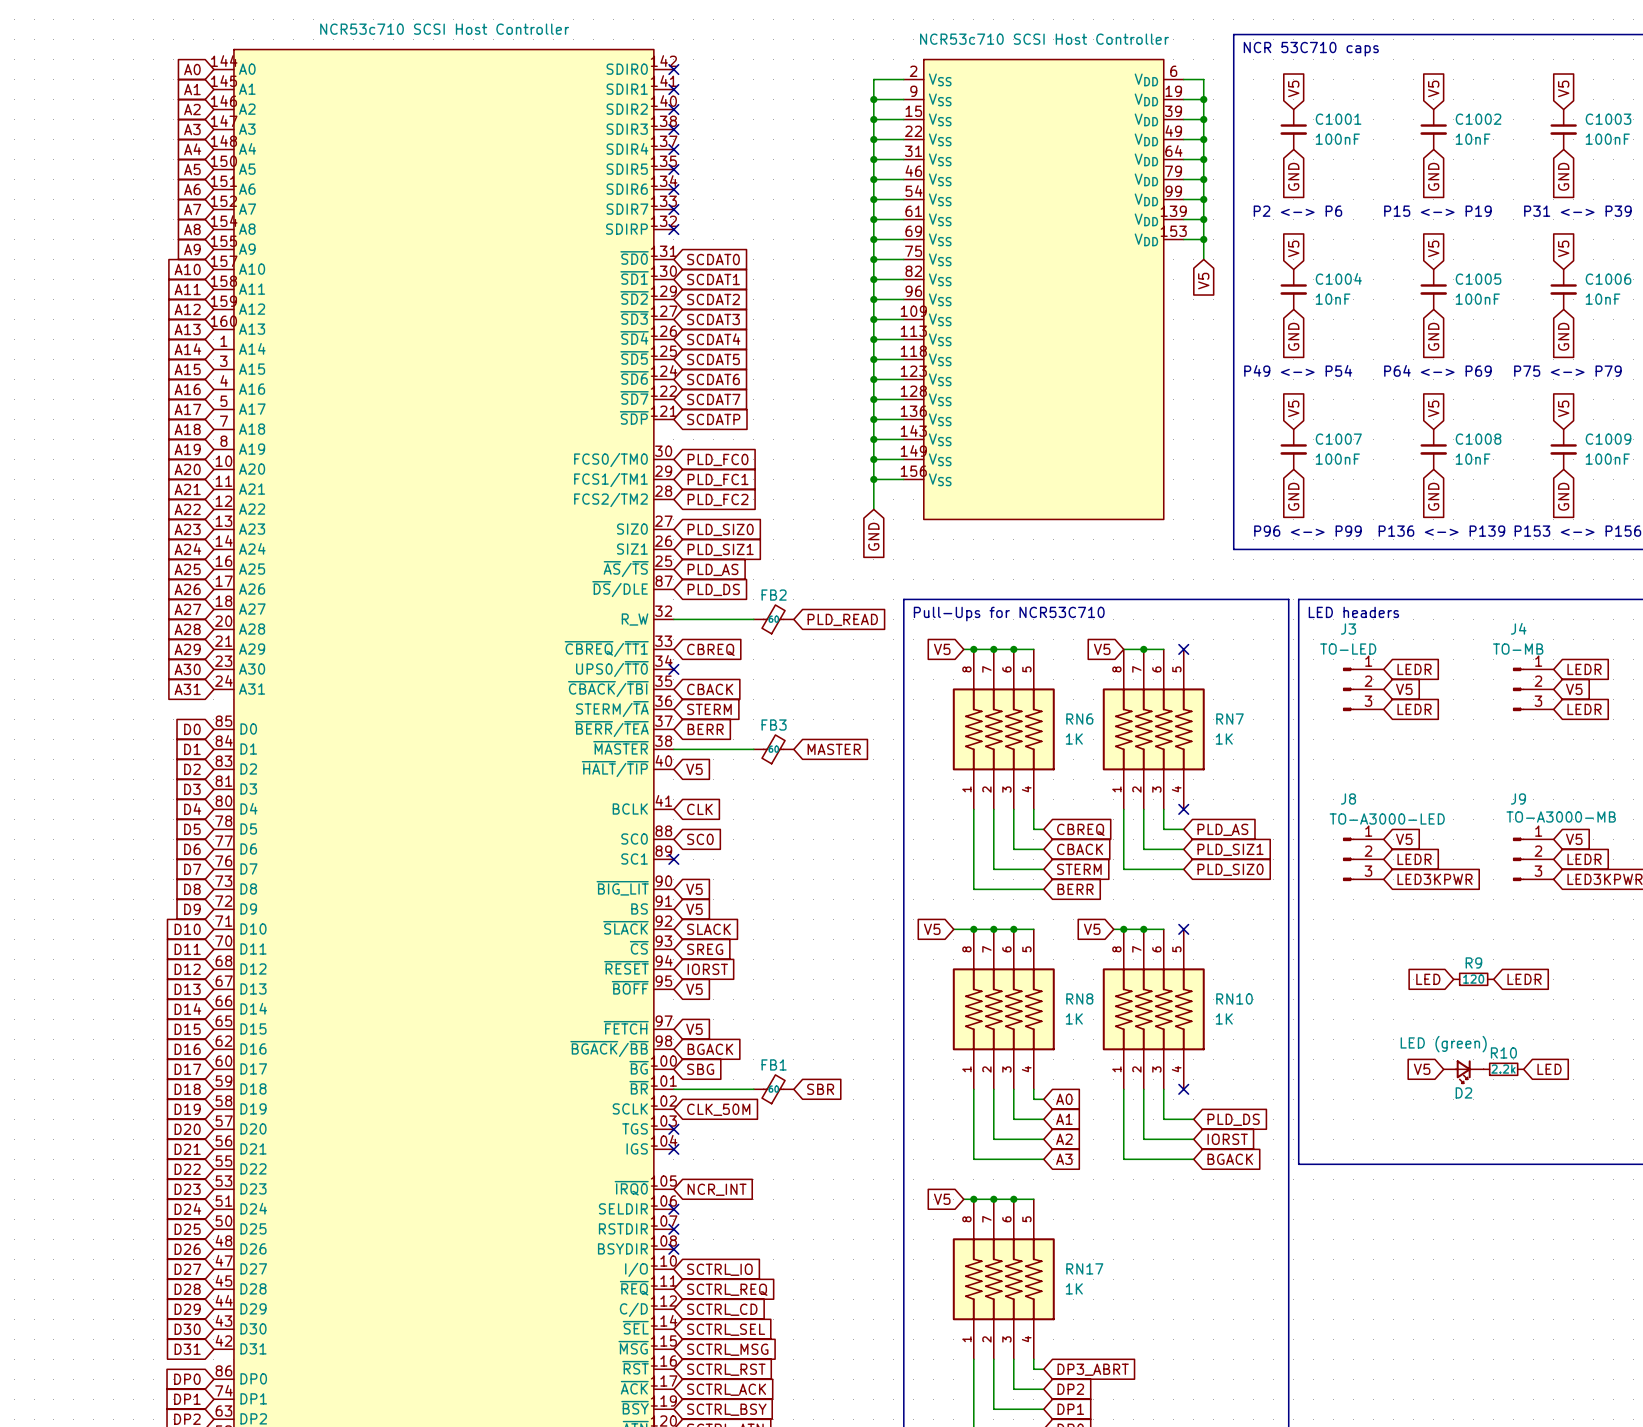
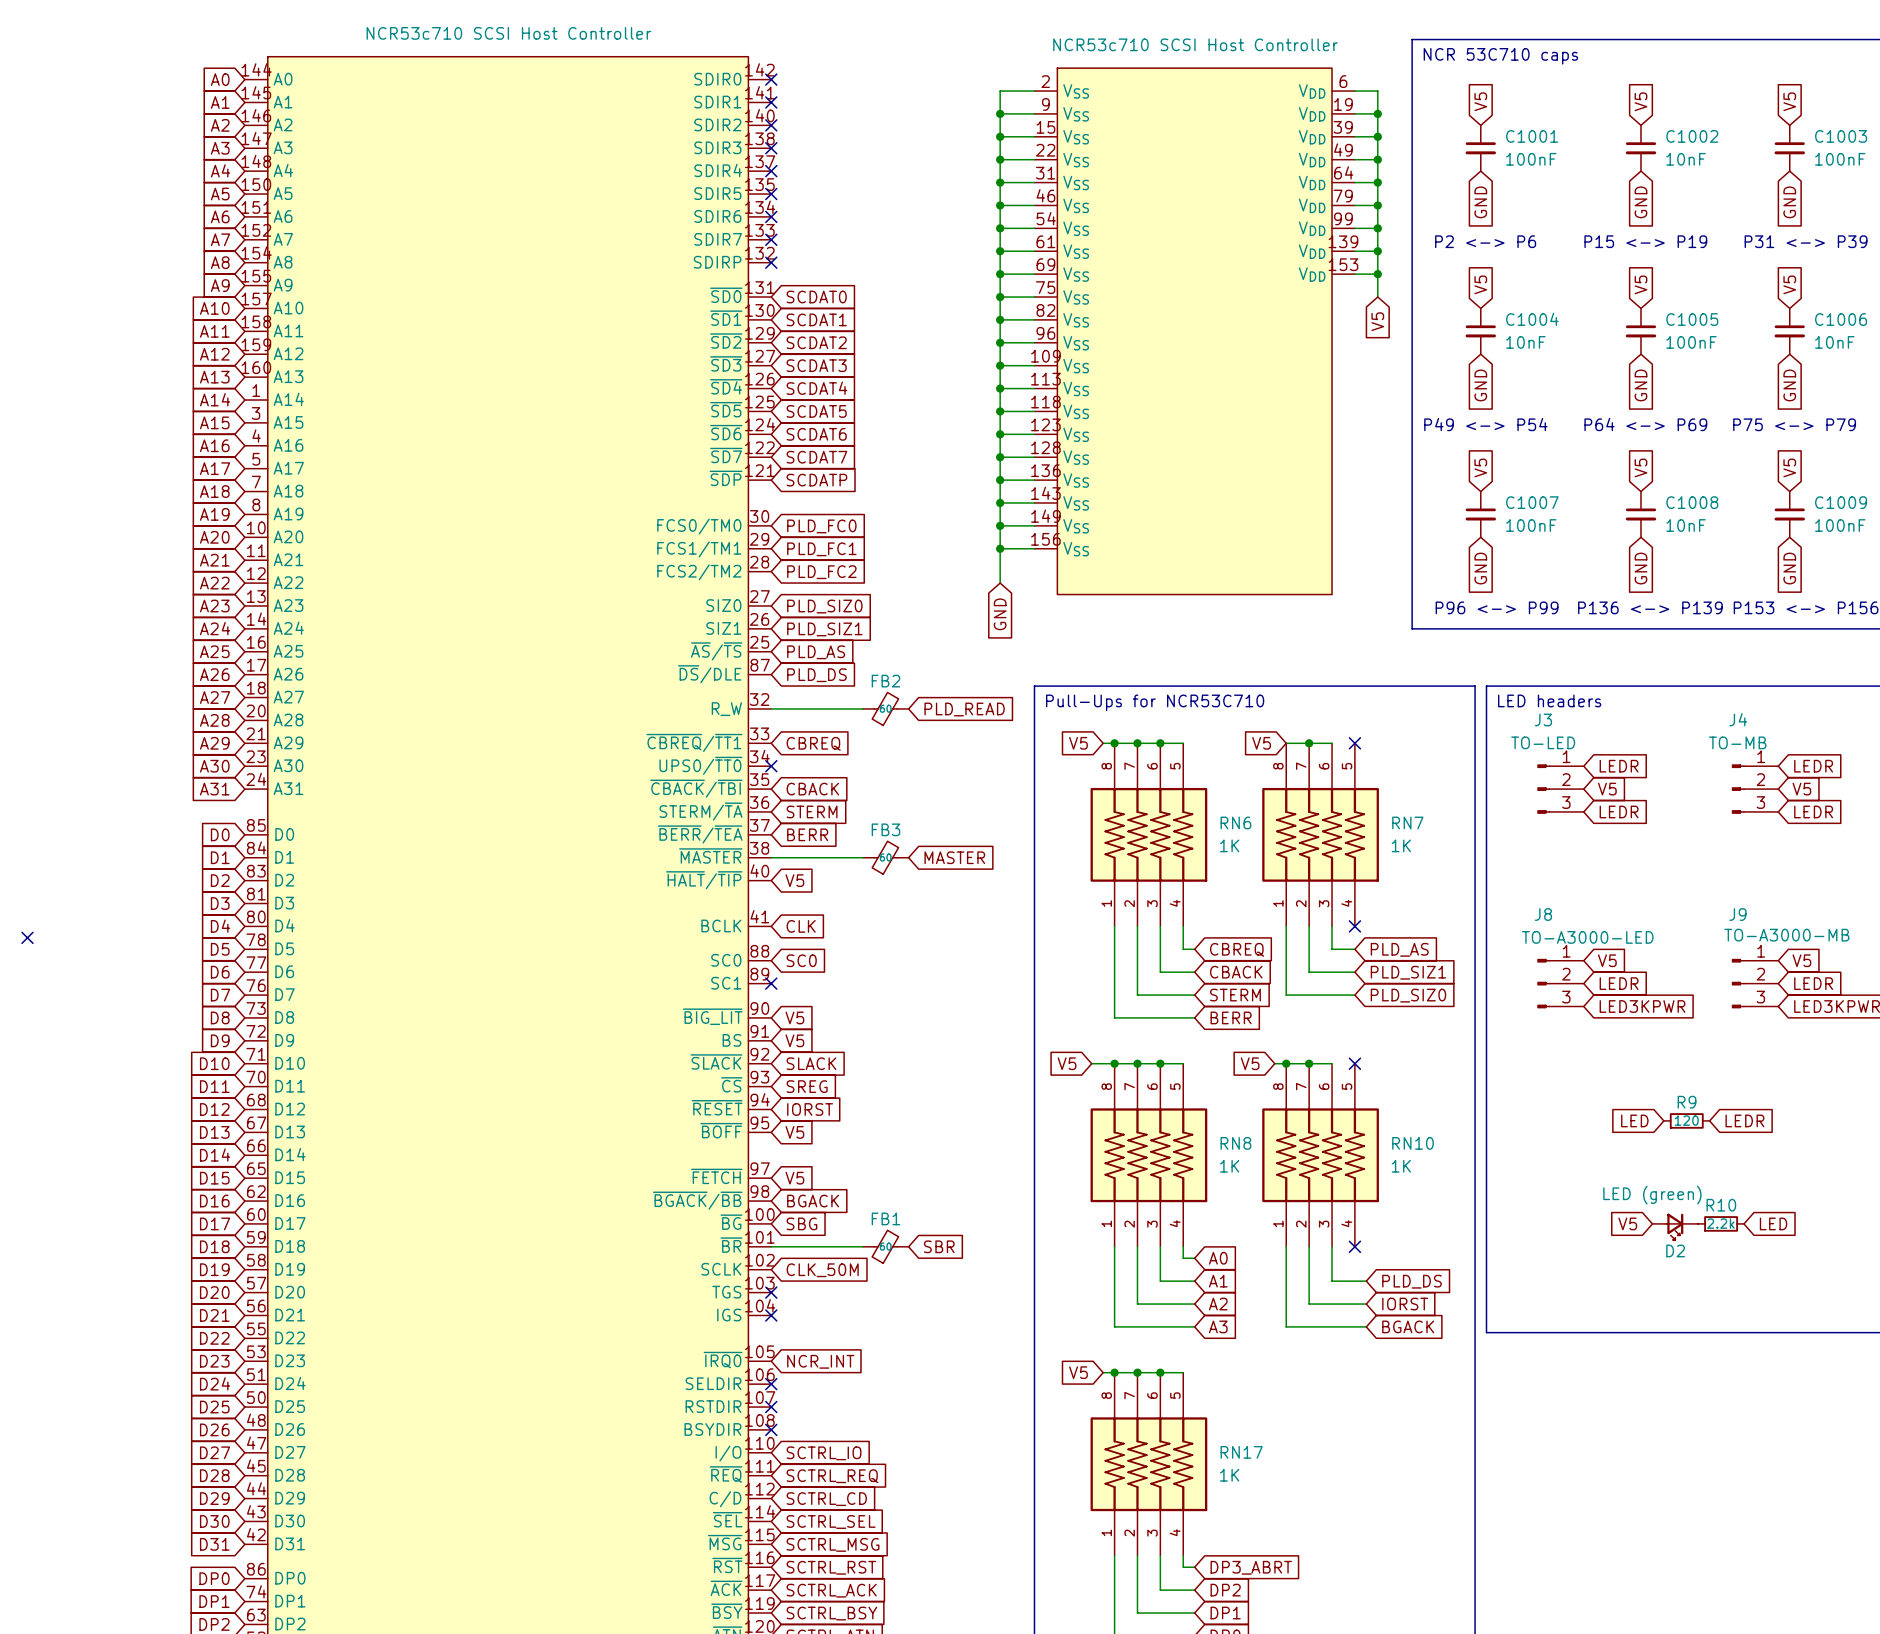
no-connect mark: none -> (27, 937)

